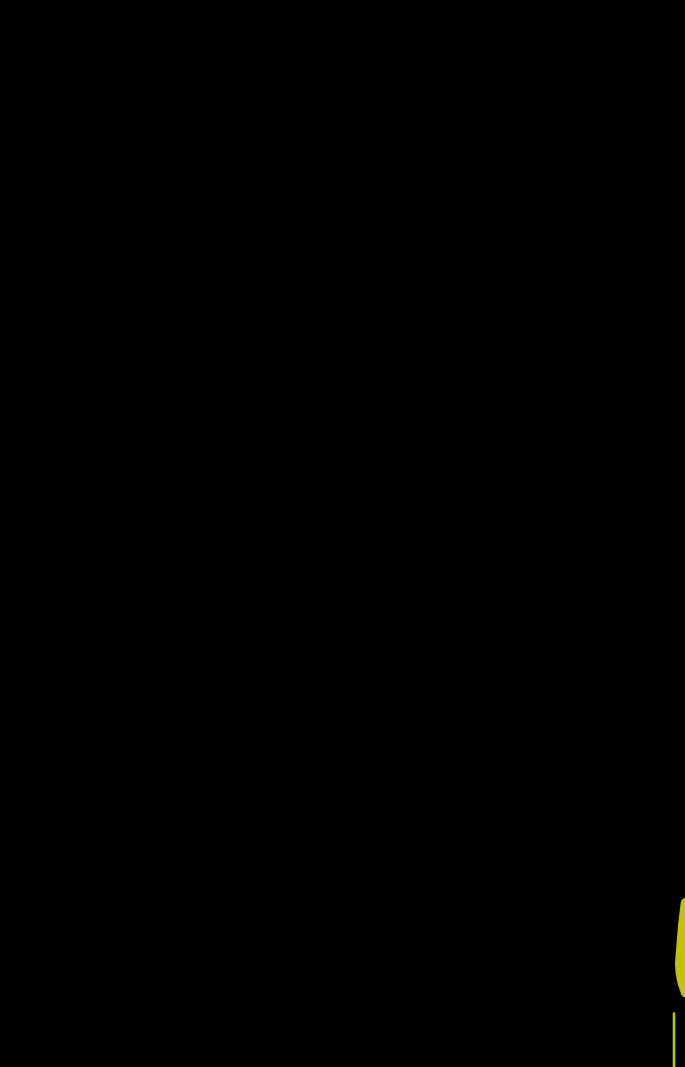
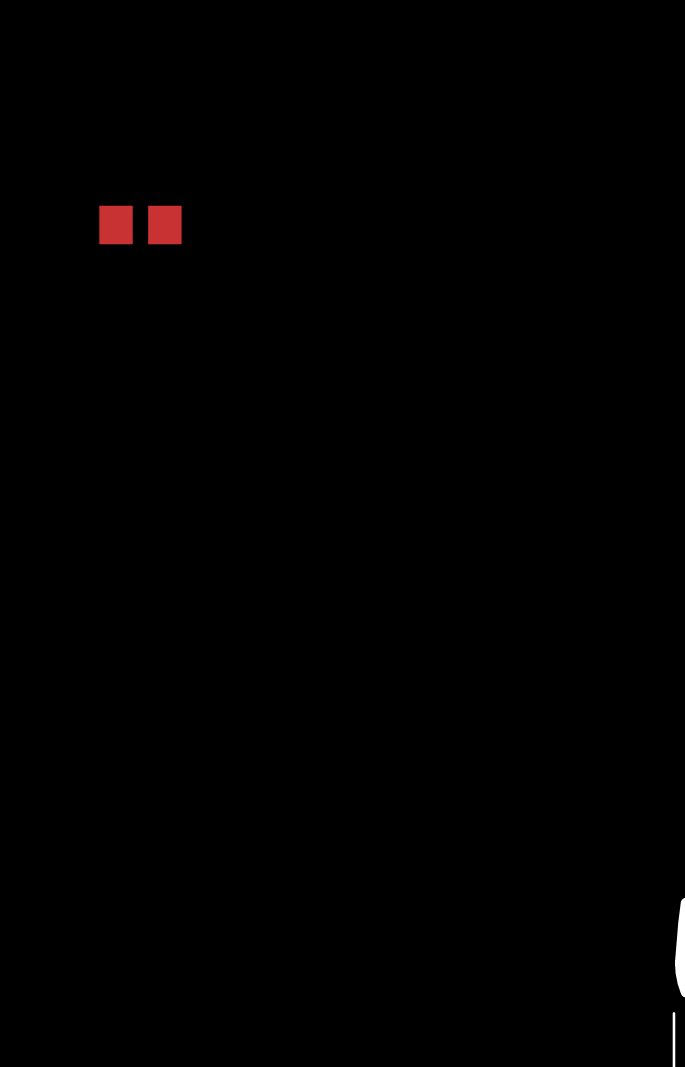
part: none -> (140, 225)

